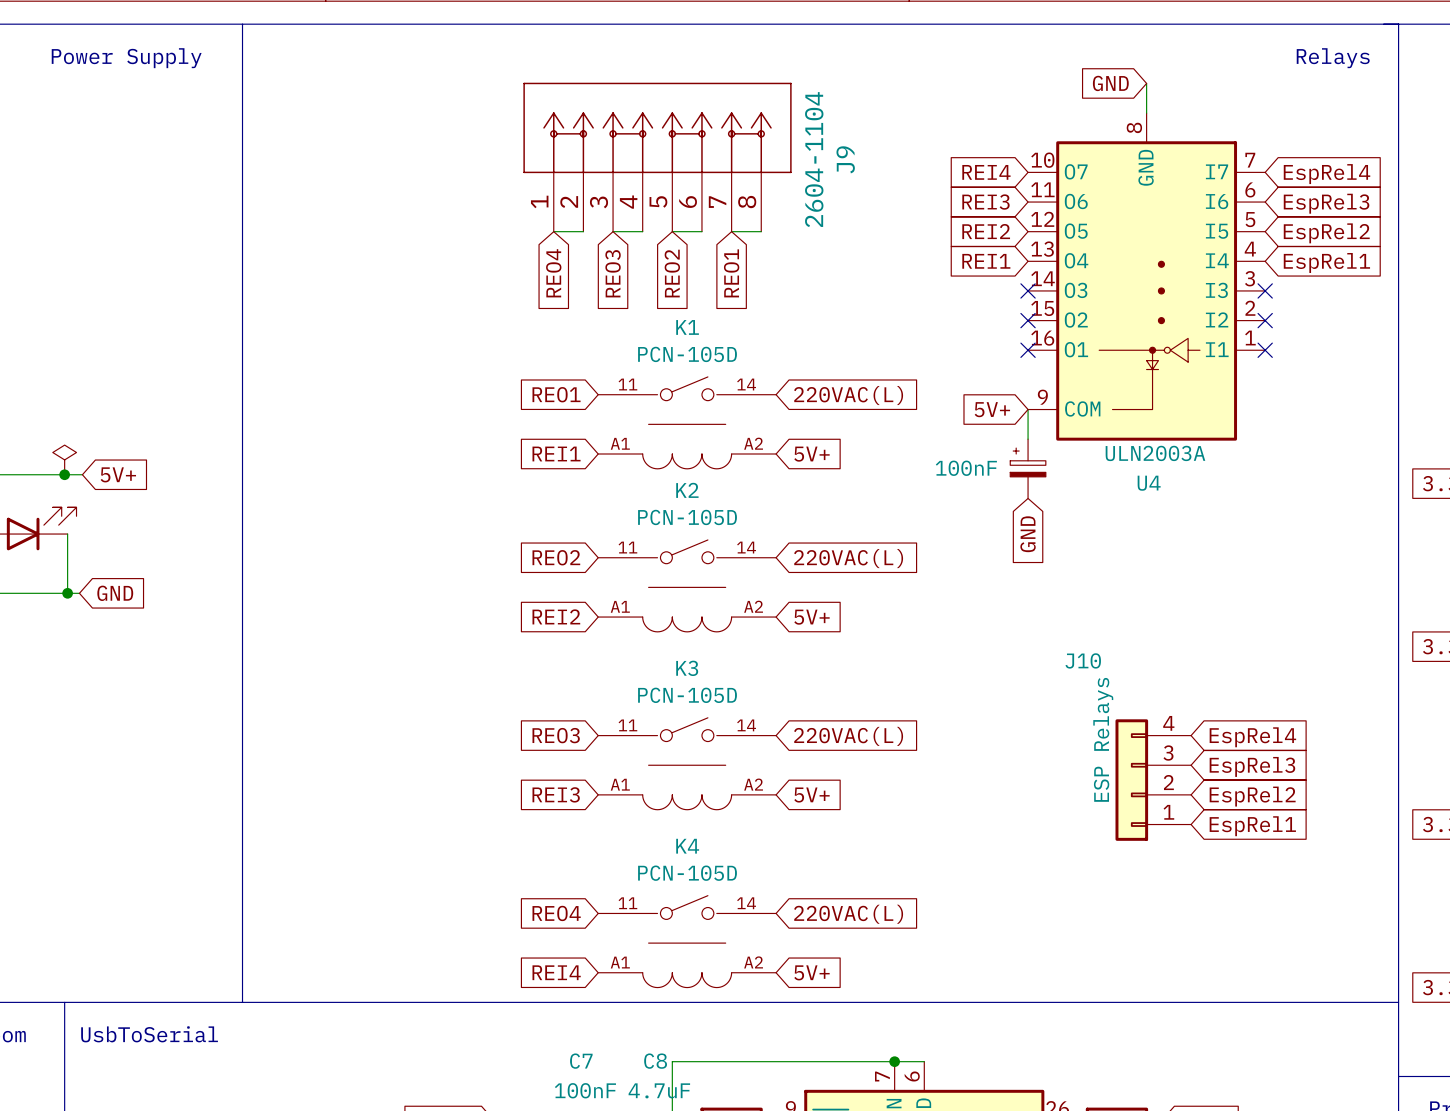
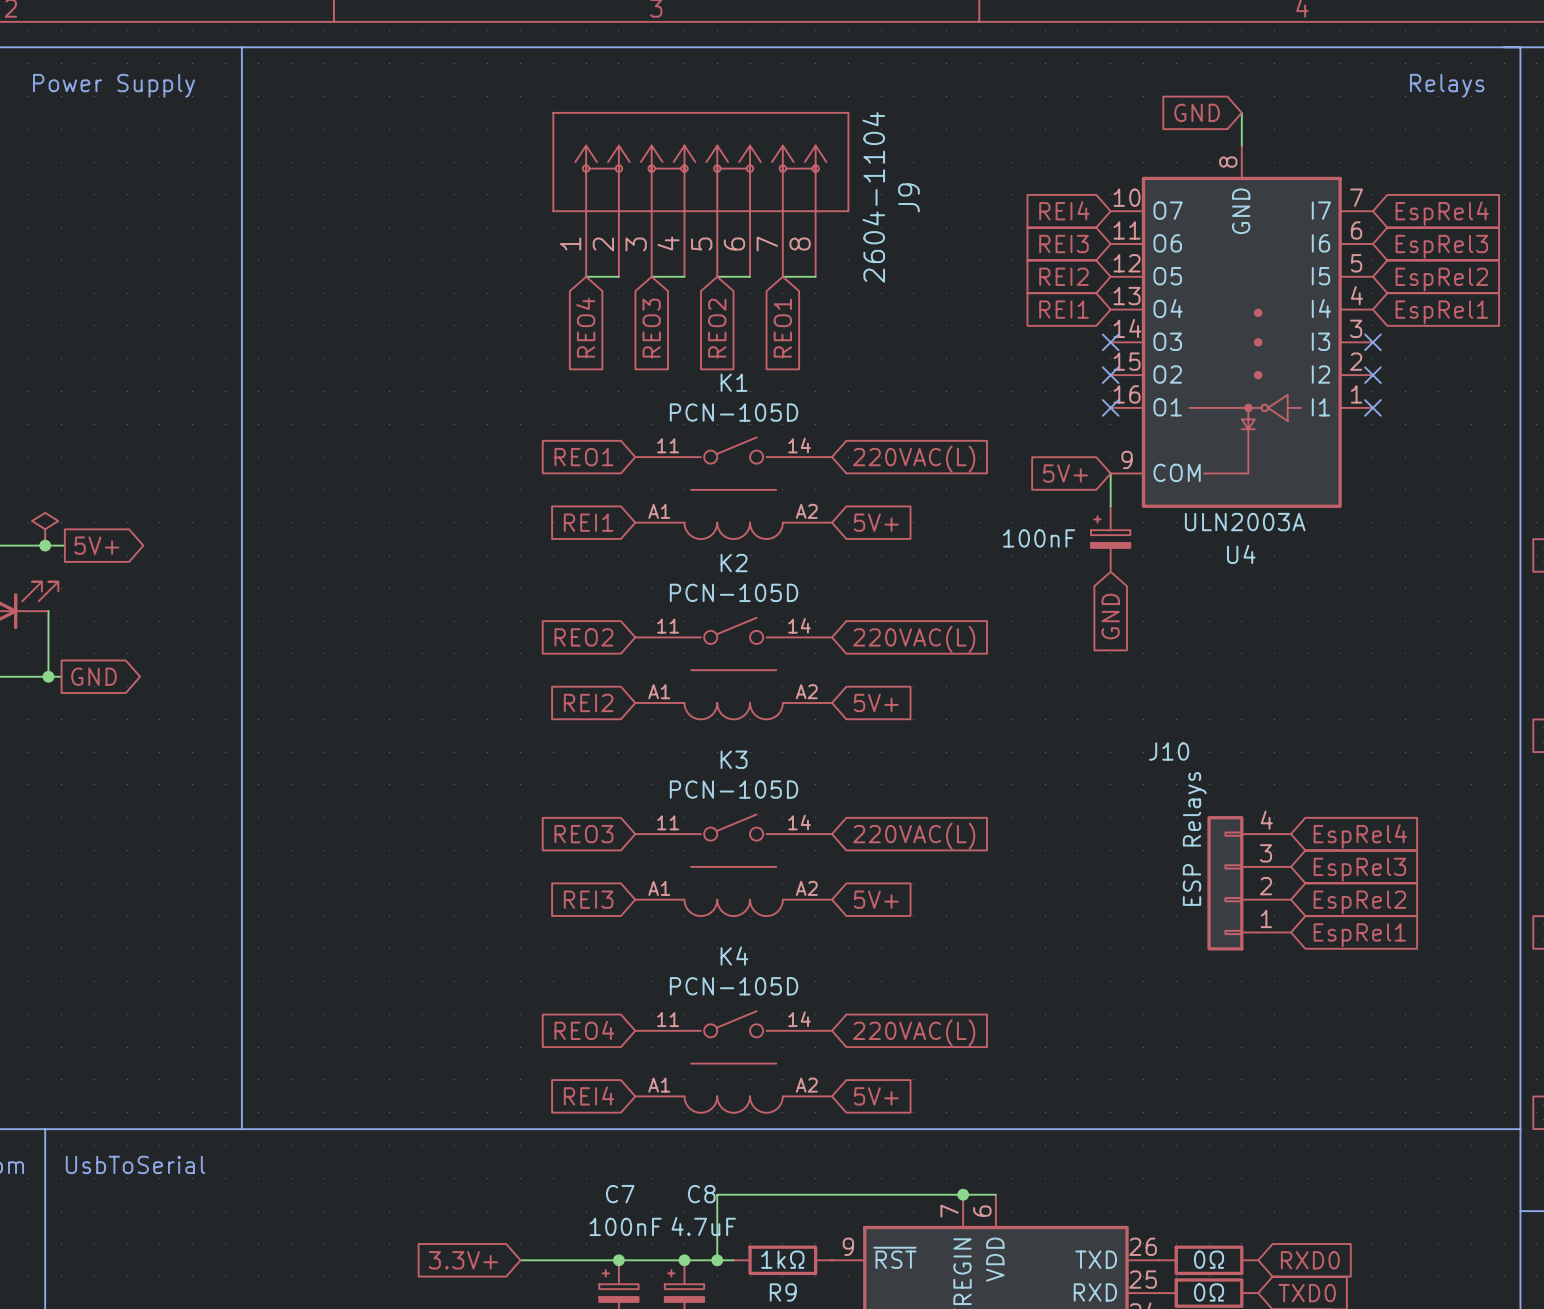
global label shape: input (118, 474) -> output (96, 545)
global label shape: input (115, 593) -> output (94, 676)

